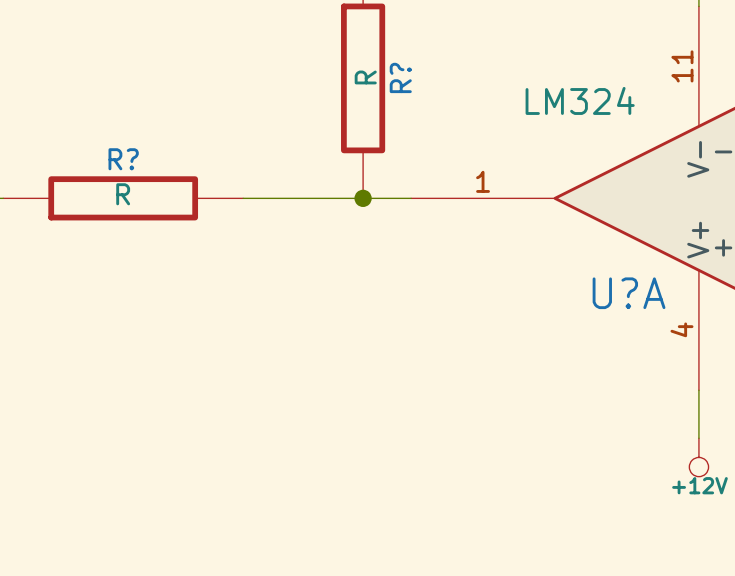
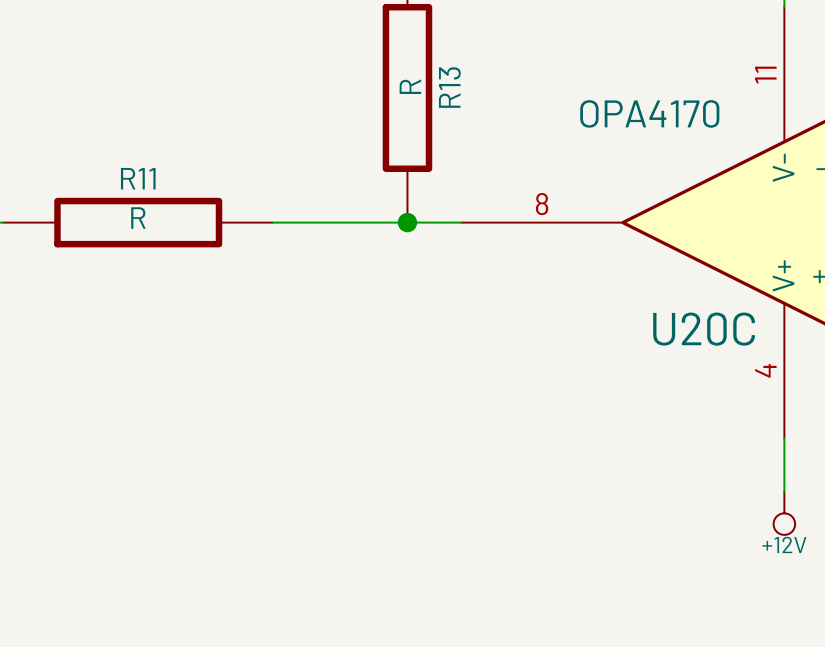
R? name: R? (400, 77) -> R13 (449, 87)
U?A value: LM324 (580, 100) -> OPA4170 (649, 113)
R? name: R? (123, 159) -> R11 (138, 178)
U?A pin number: 1 (483, 181) -> 8 (542, 204)
U?A name: U?A (629, 293) -> U20C (704, 329)

